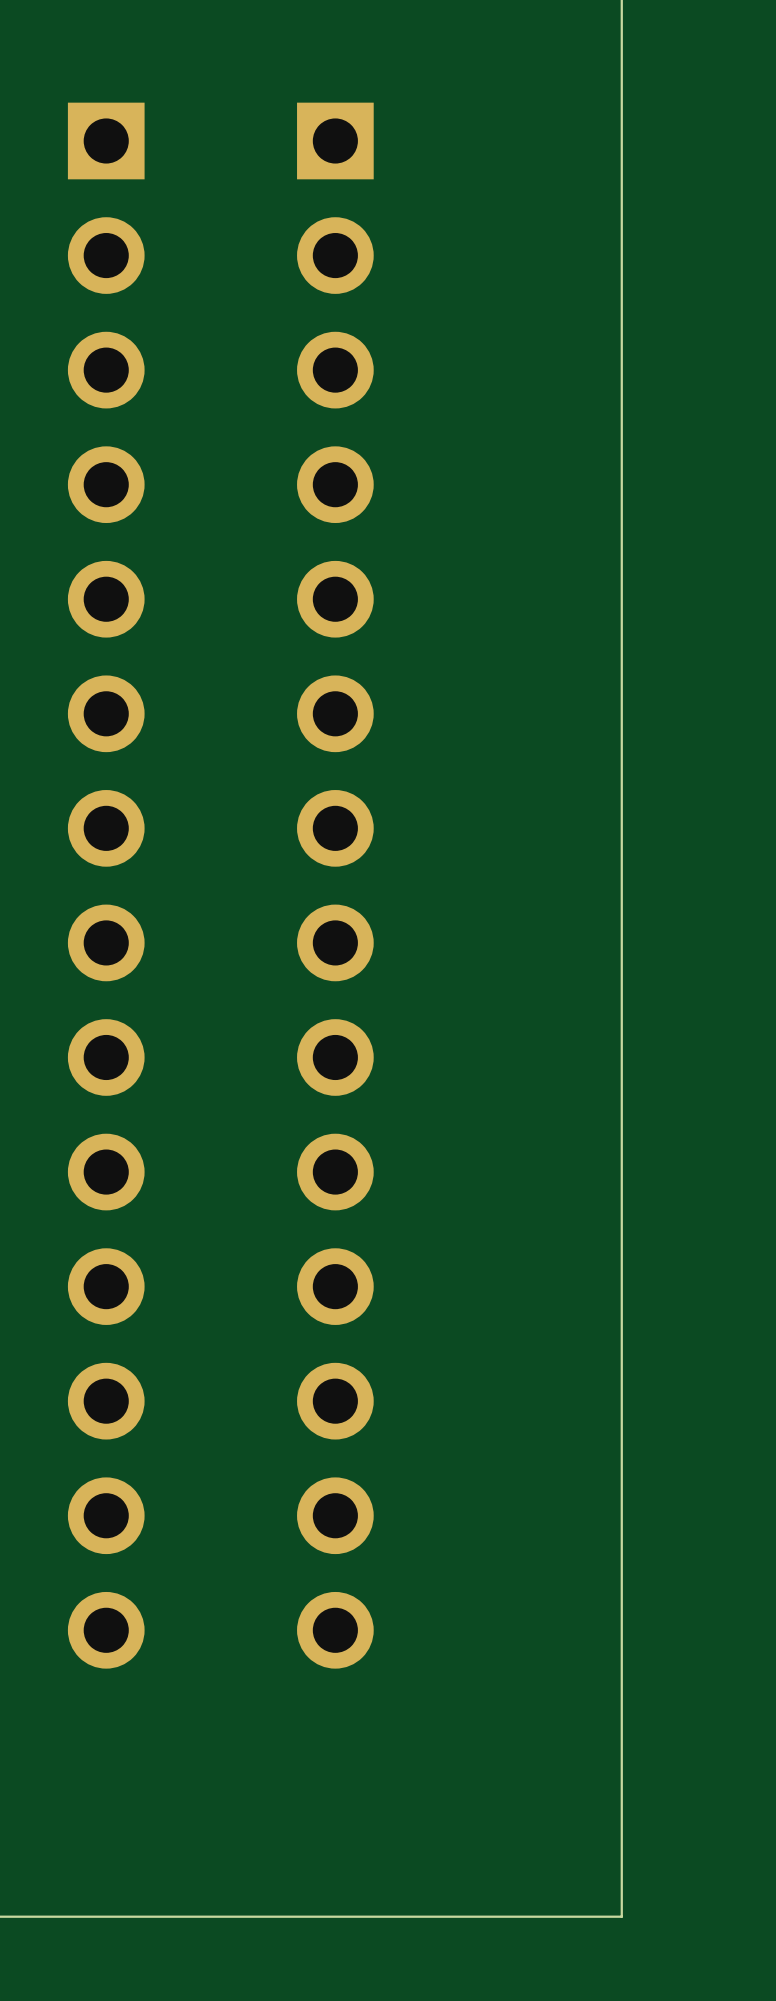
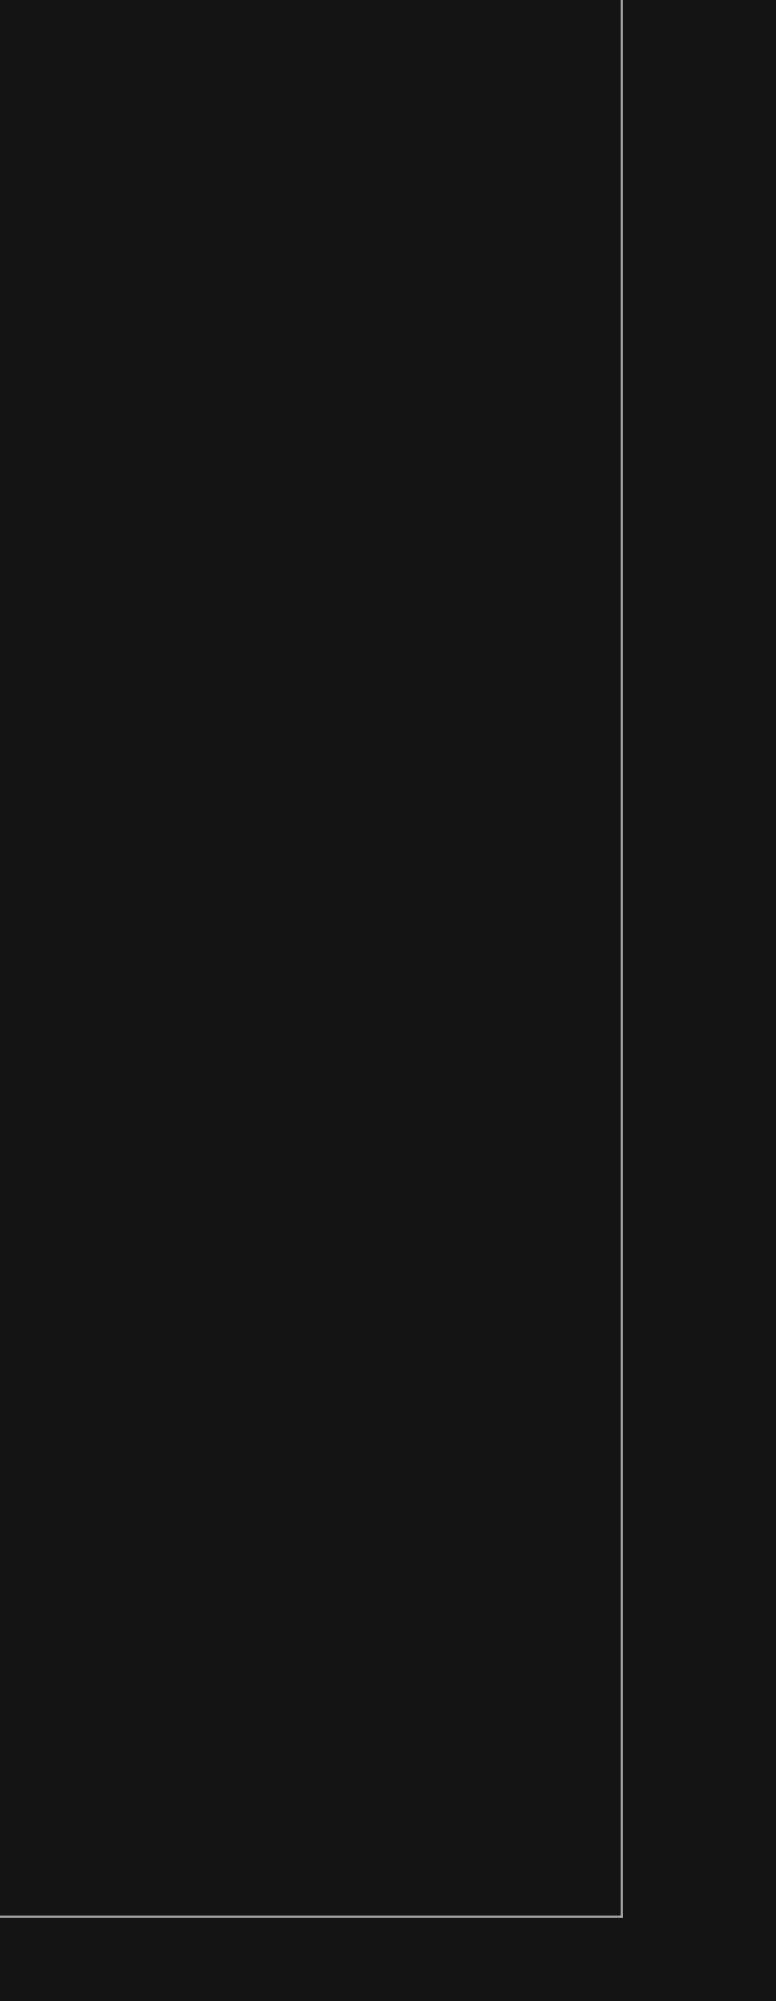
part: (106, 885) -> none
part: (335, 885) -> none

